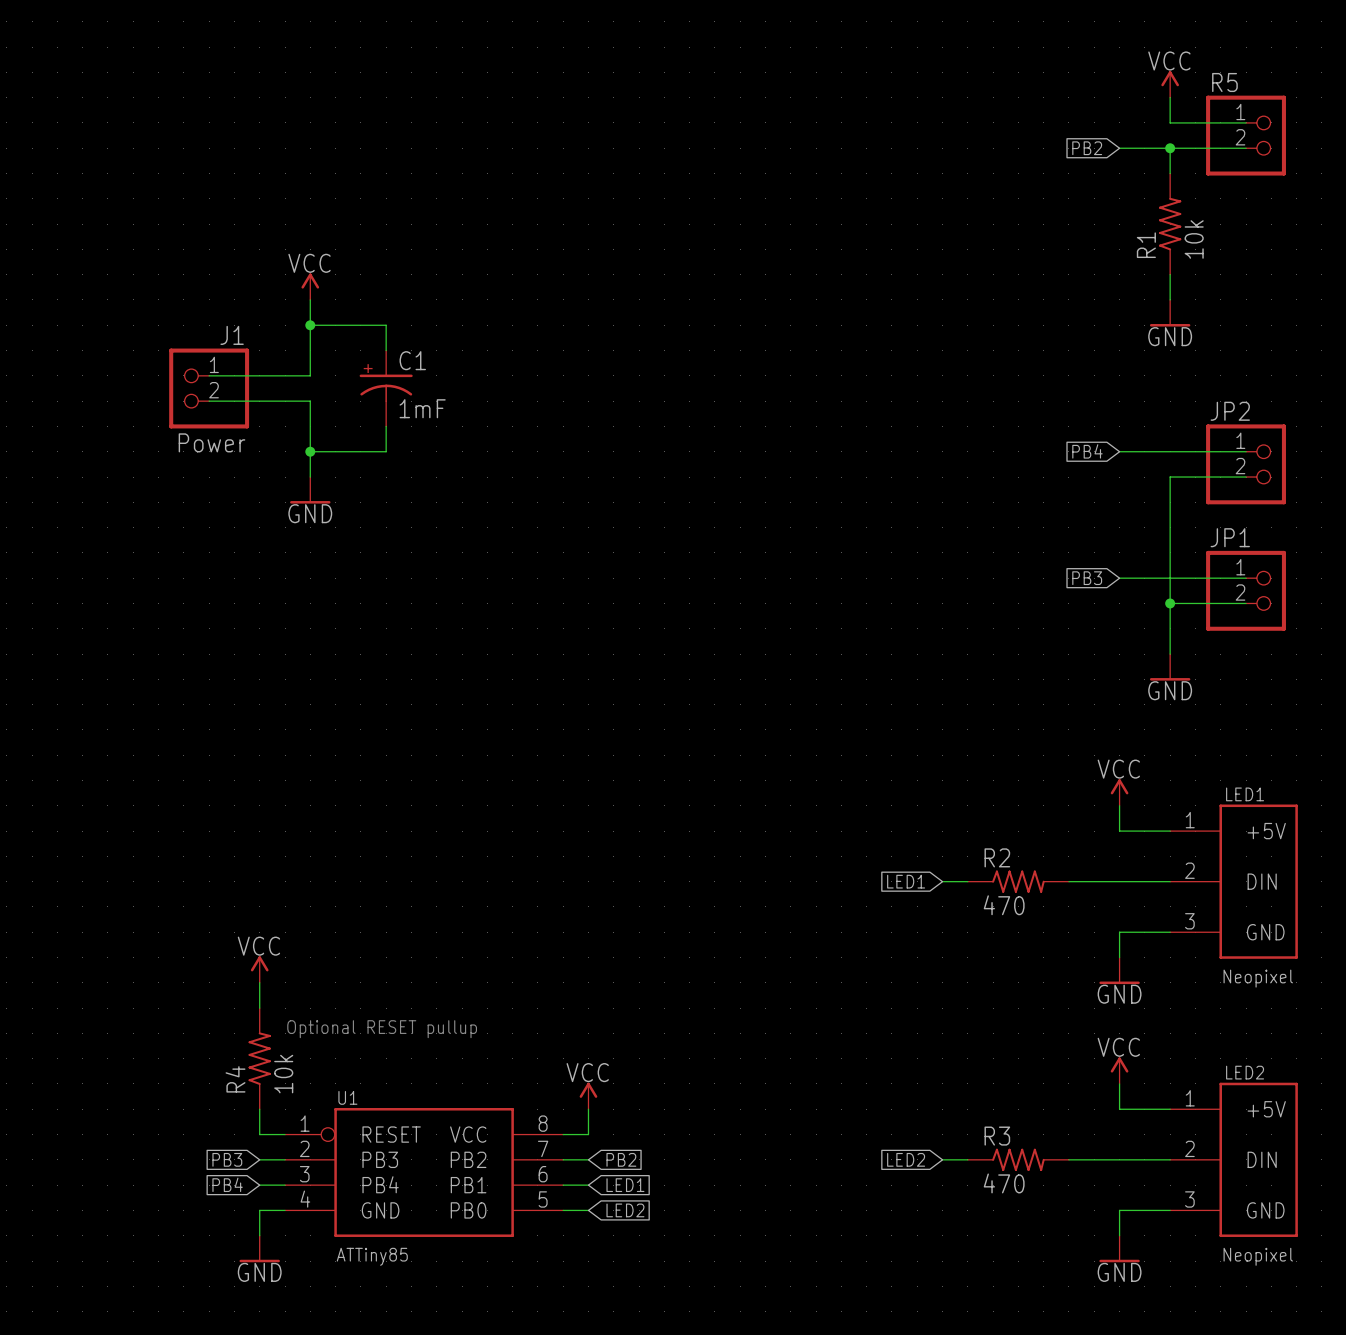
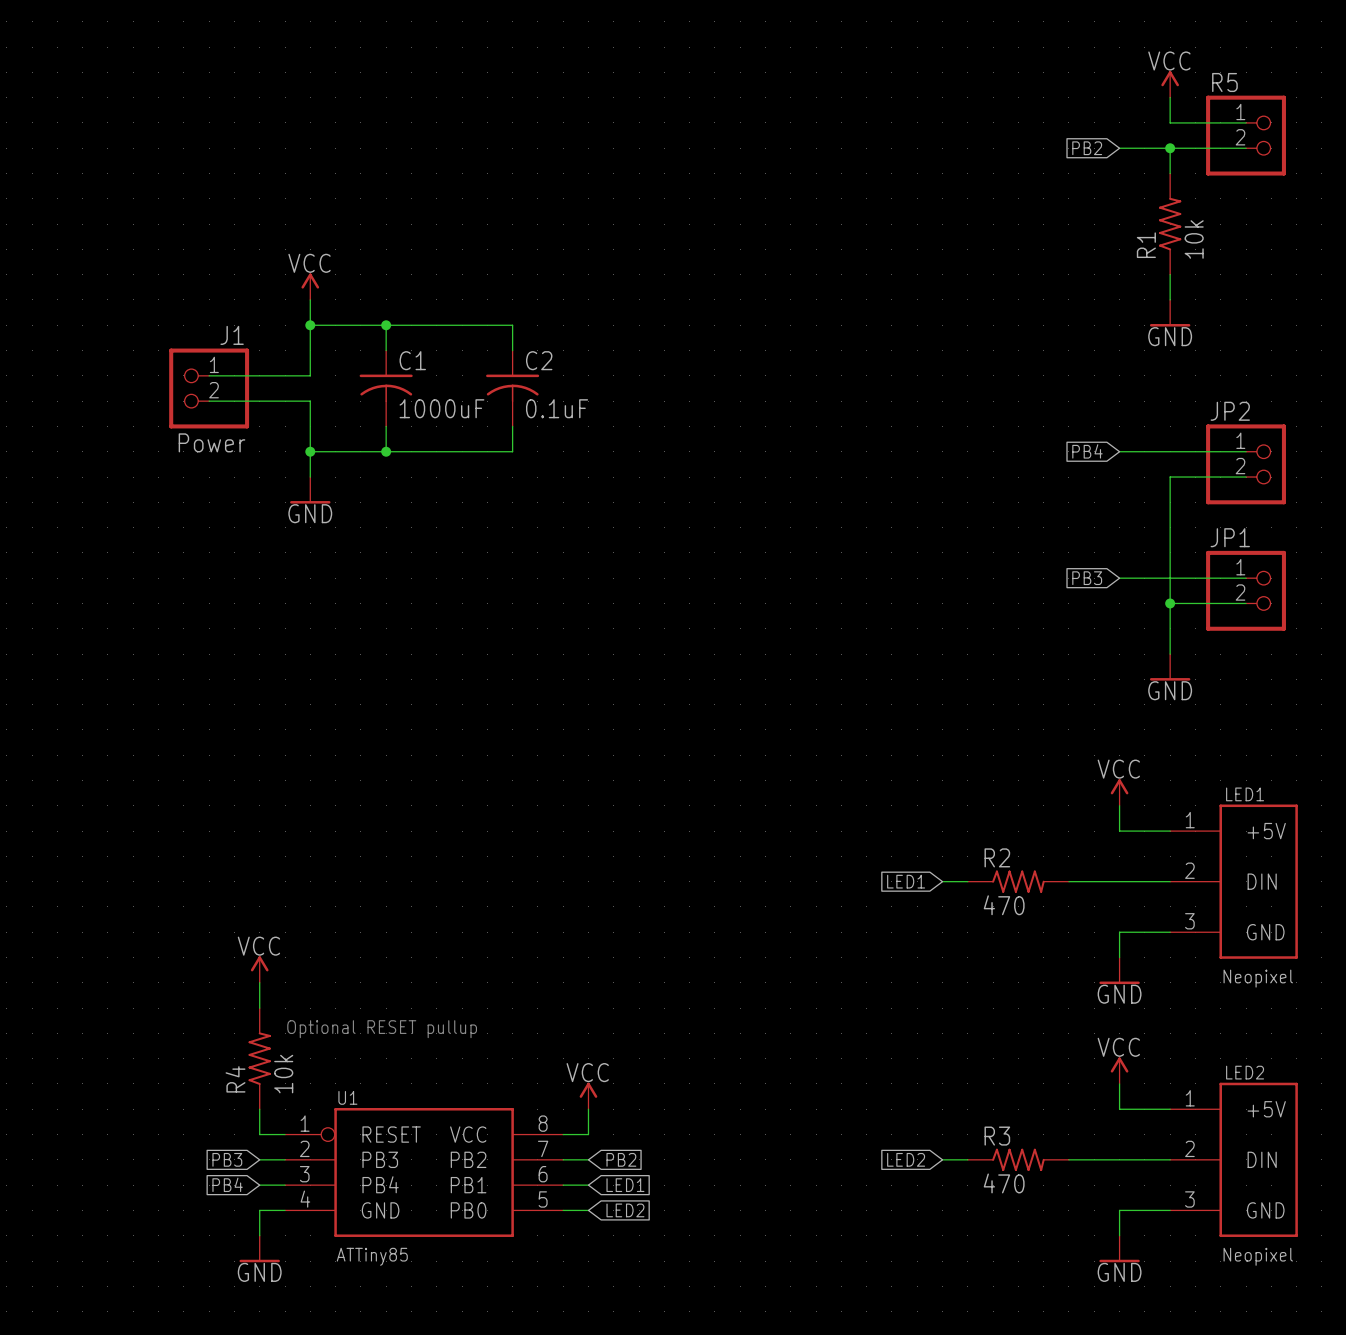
wire: none -> (386, 325) (512, 325) (512, 350)
junction: none -> (386, 325)
C1 symbol: [359, 350, 413, 427] -> [359, 350, 413, 427]
C2: none -> 0.1uF (512, 388)
C1 value: 1mF (422, 408) -> 1000uF (441, 408)
wire: none -> (512, 426) (512, 451) (386, 451)
junction: none -> (386, 451)

